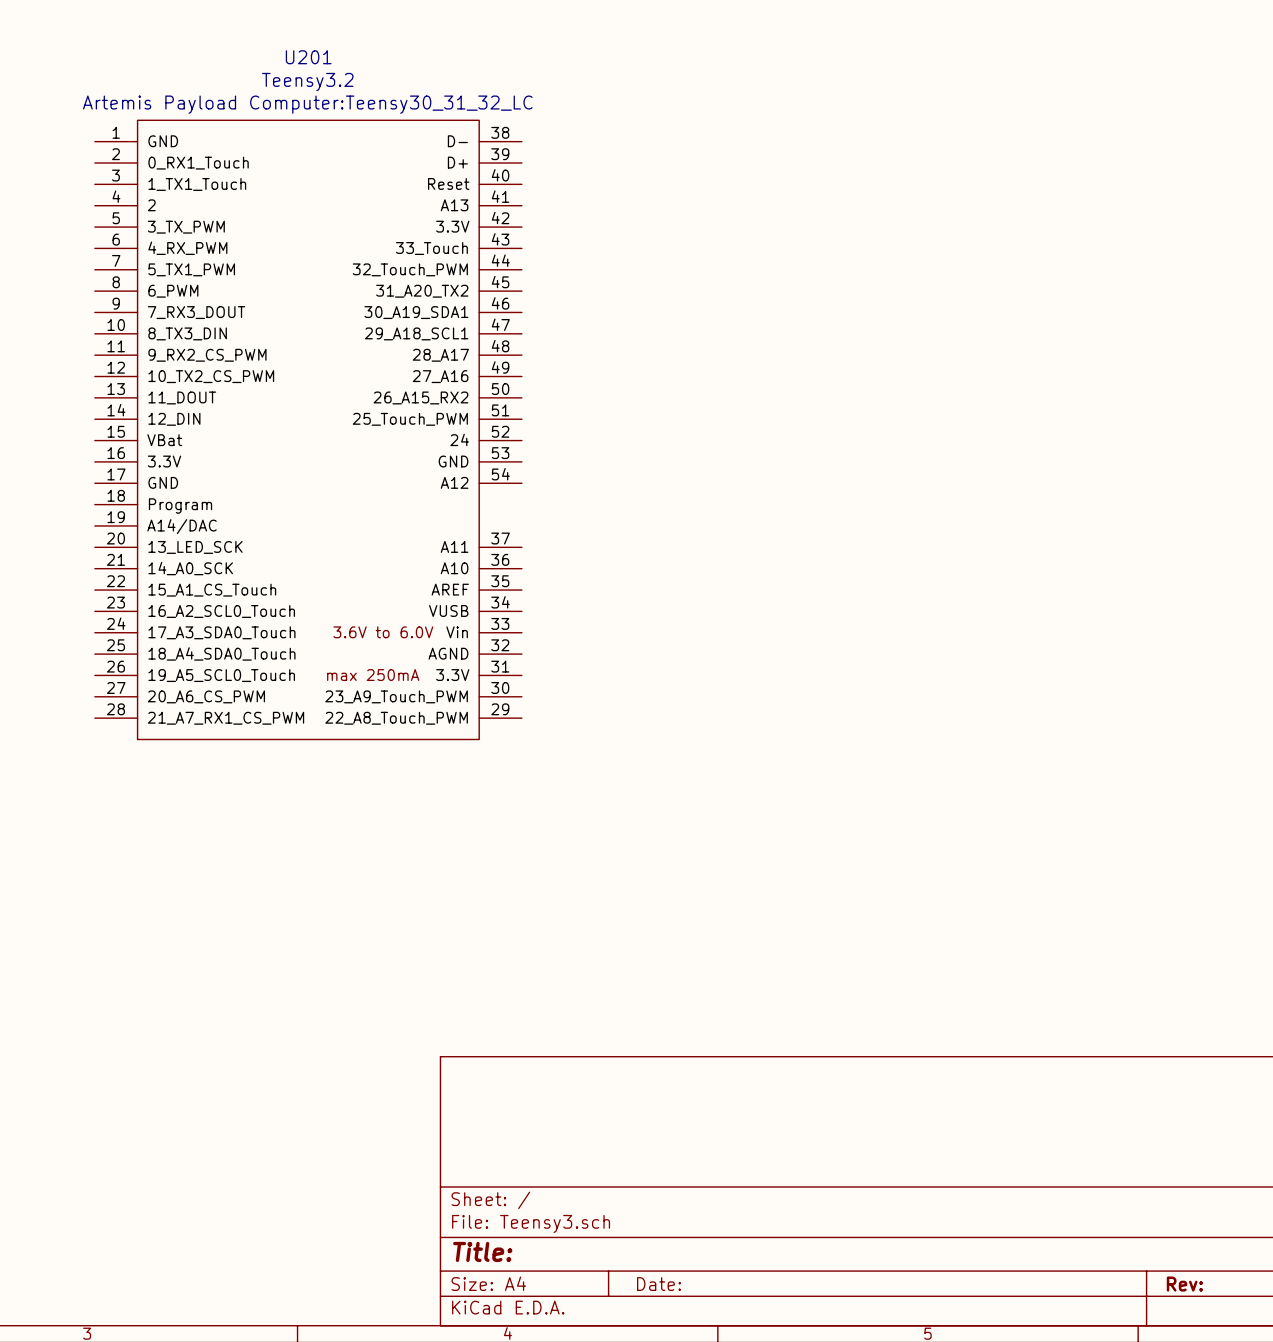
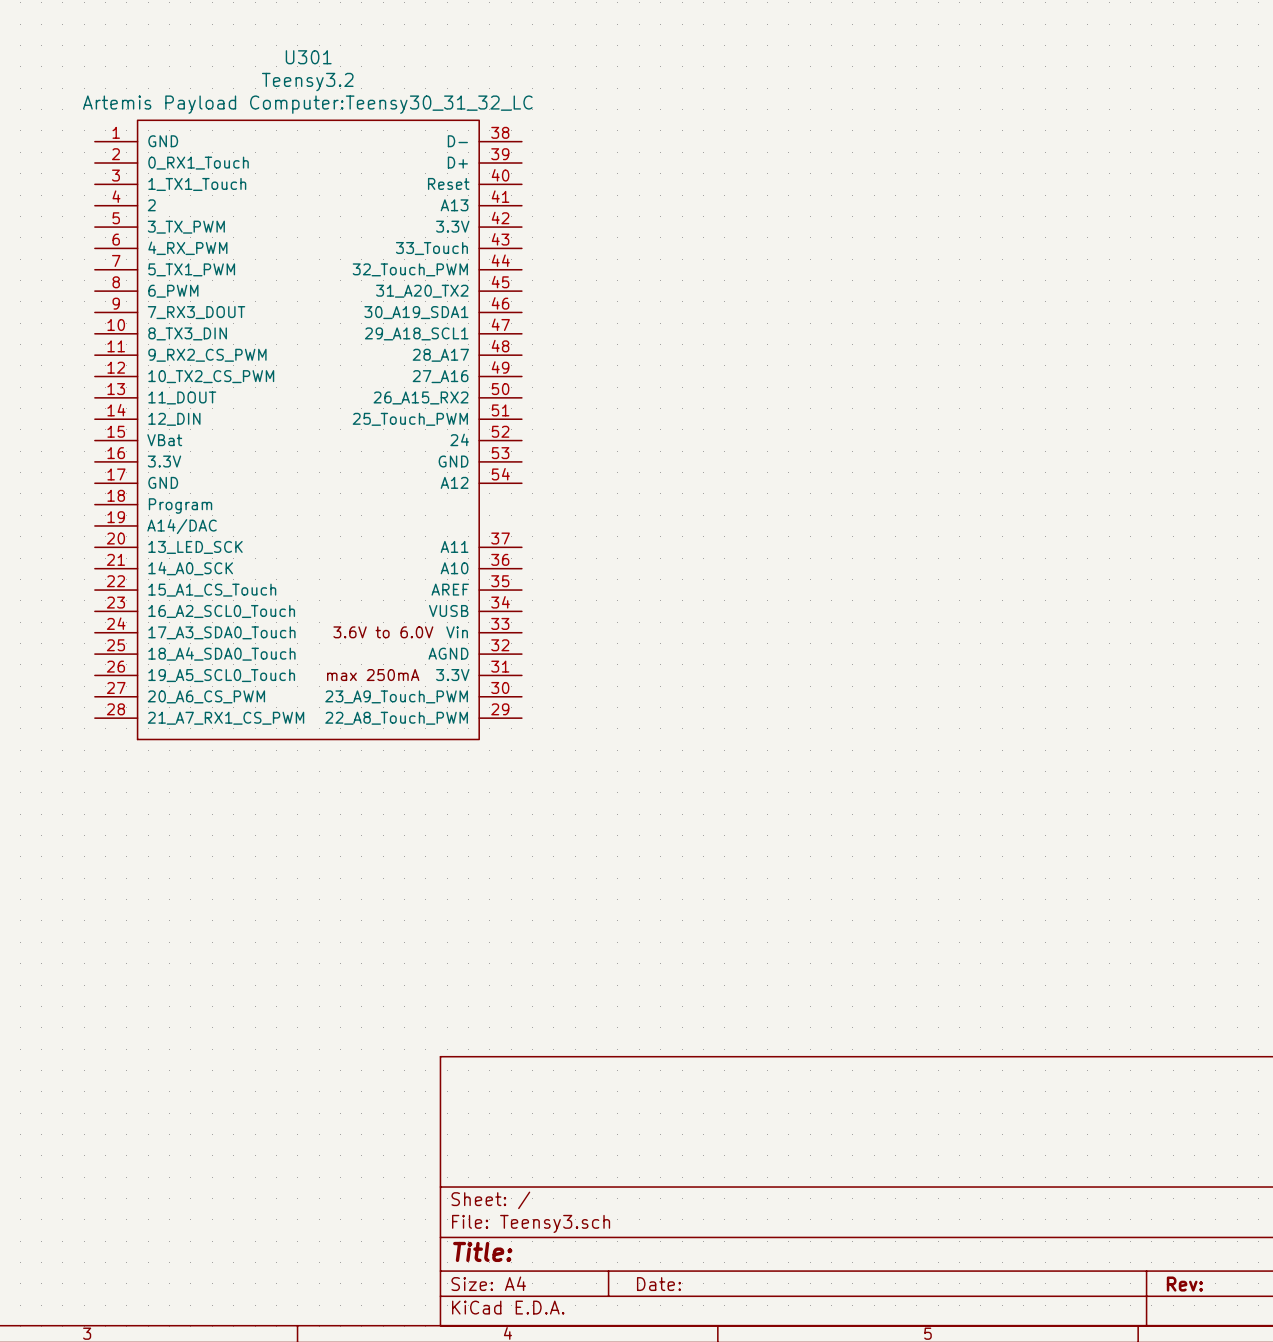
U201 name: U201 (308, 57) -> U301 (308, 57)

